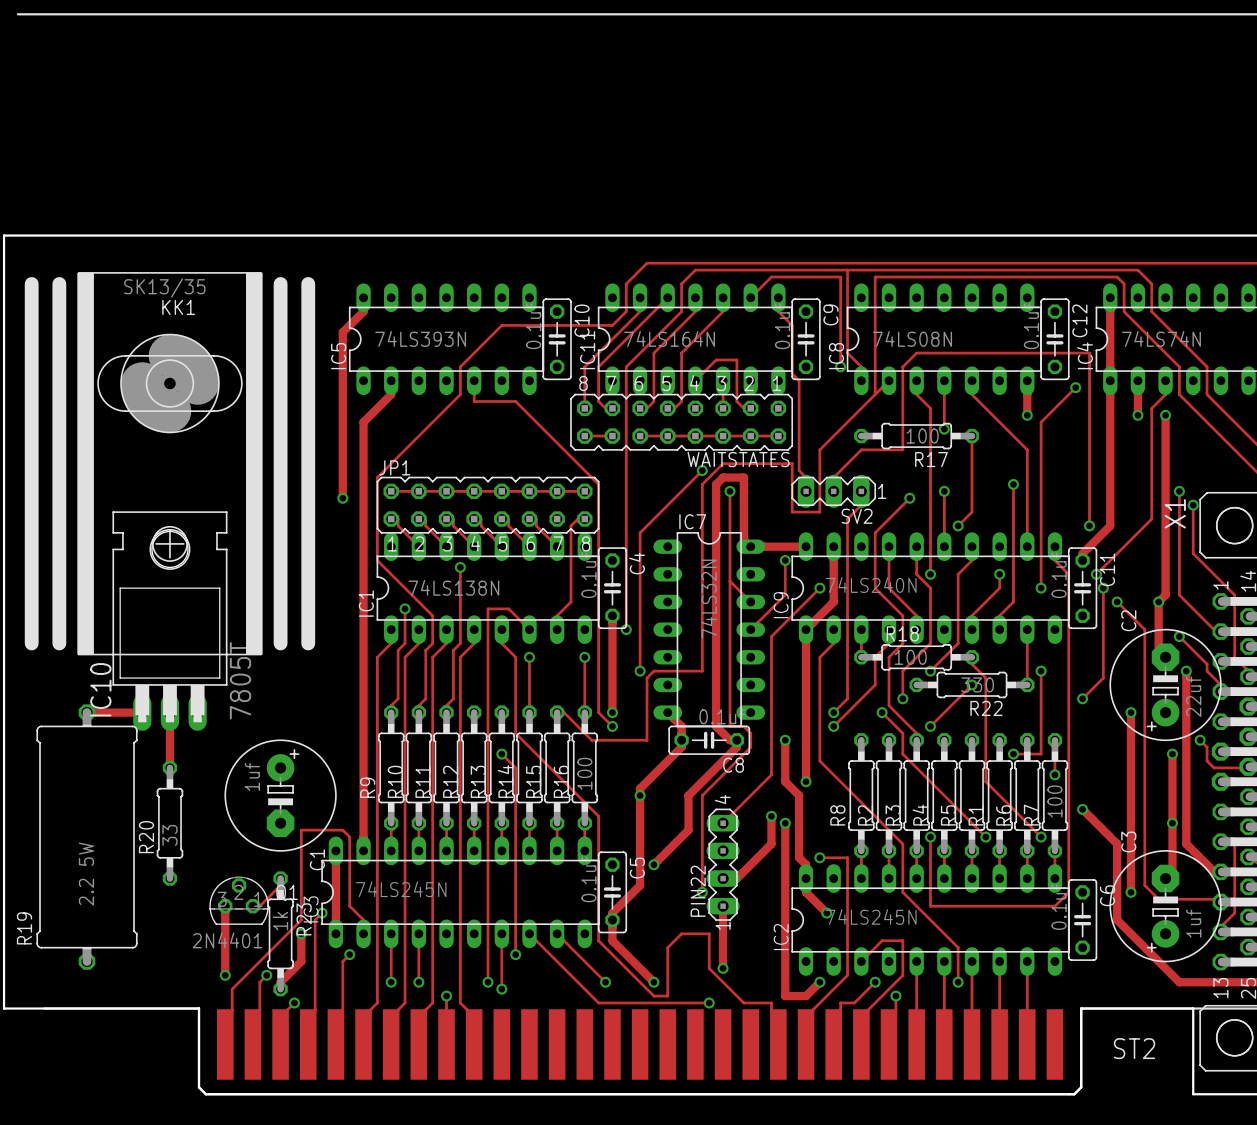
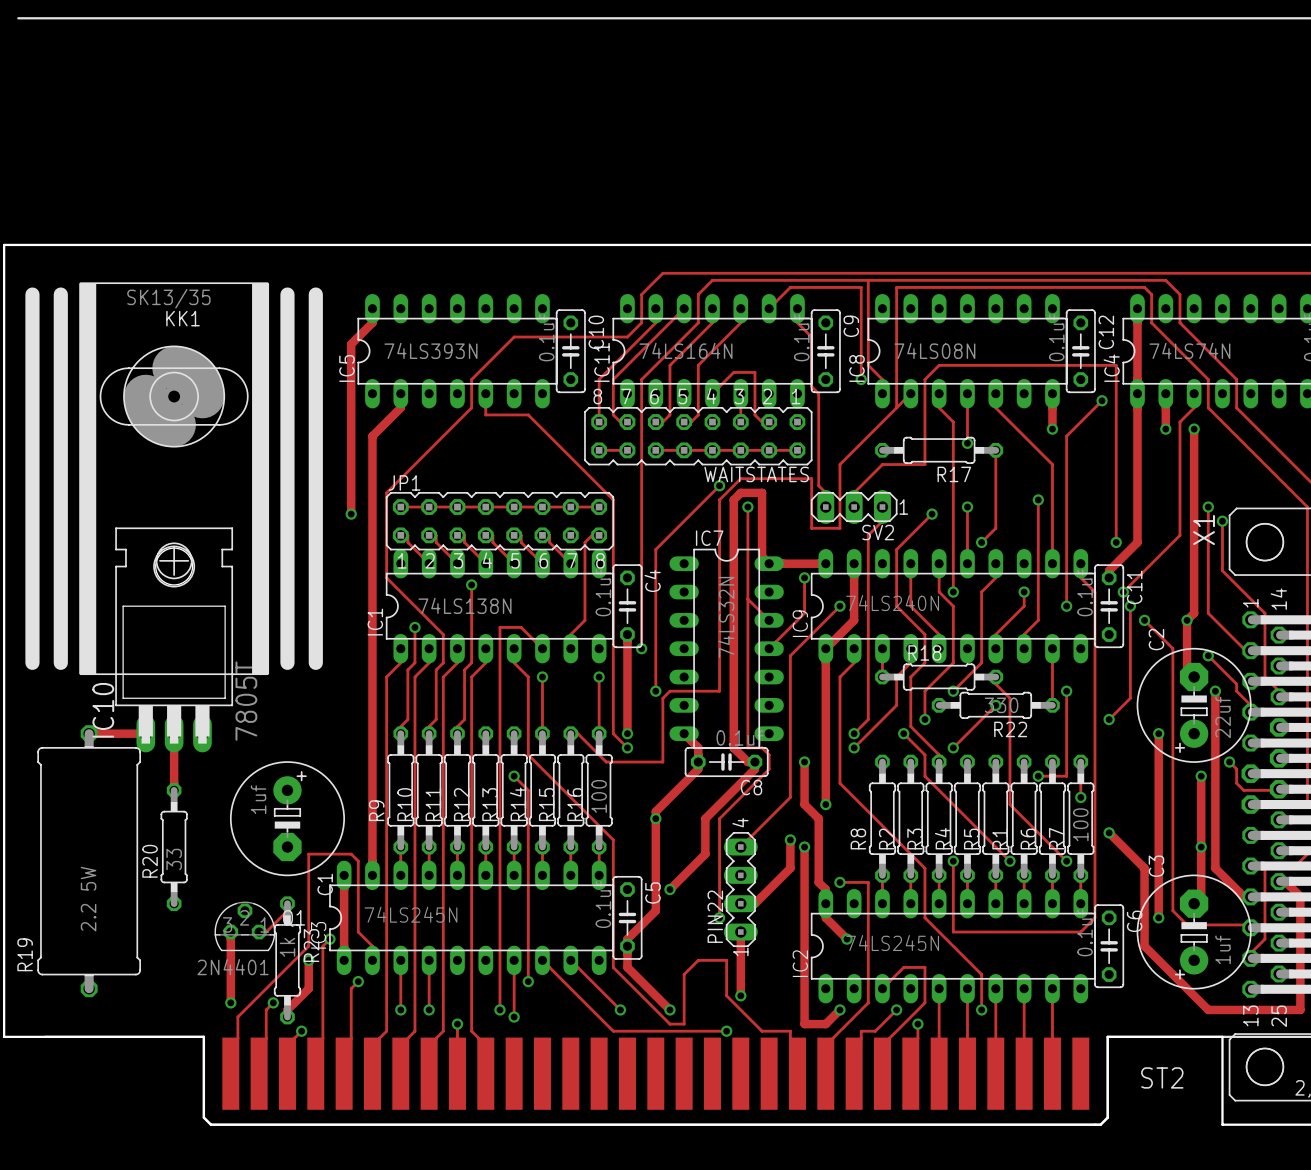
R17 value: 100 (922, 436) -> none
R18 value: 100 (910, 657) -> none

